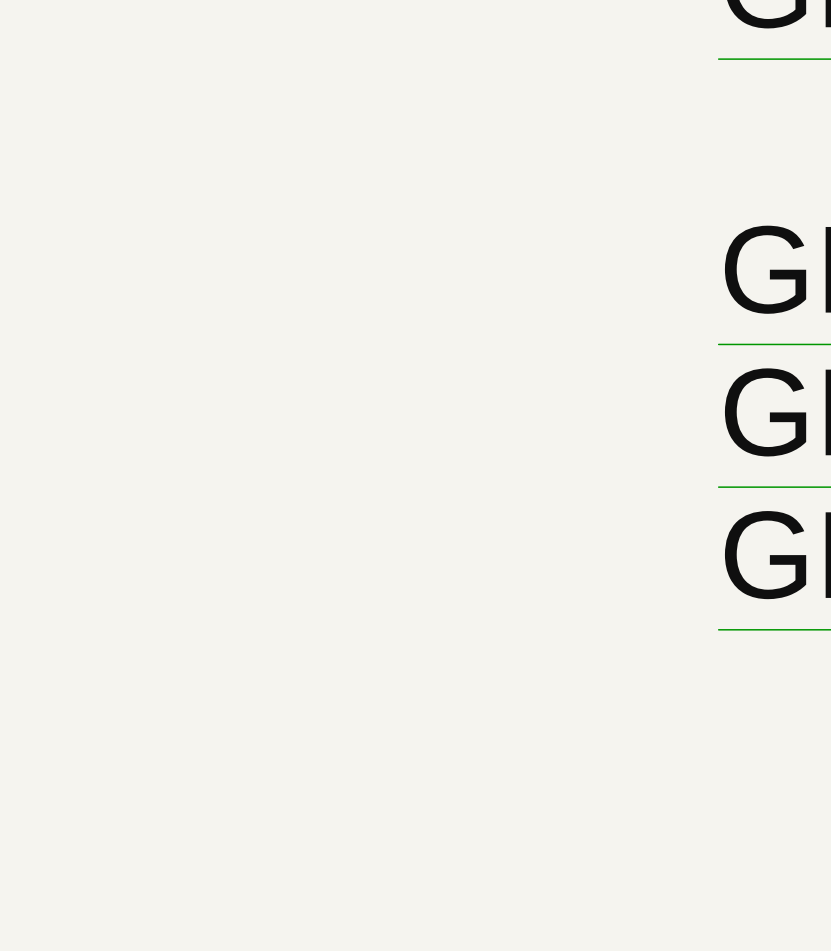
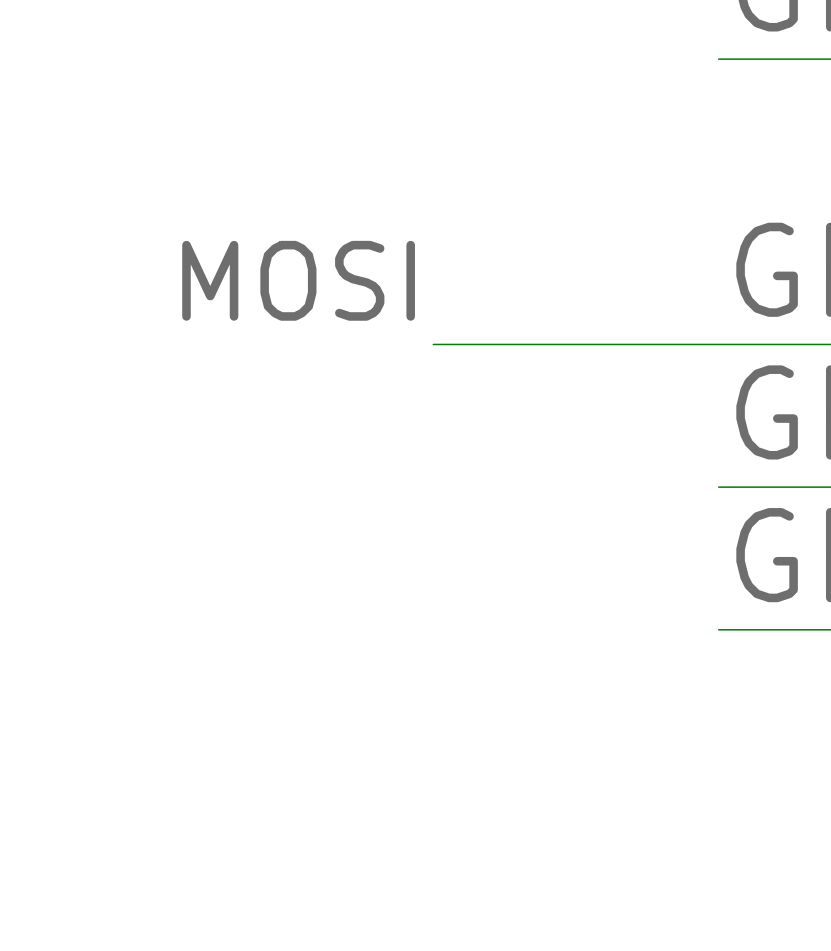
label: none -> MOSI (298, 280)
wire: none -> (433, 344) (718, 344)

